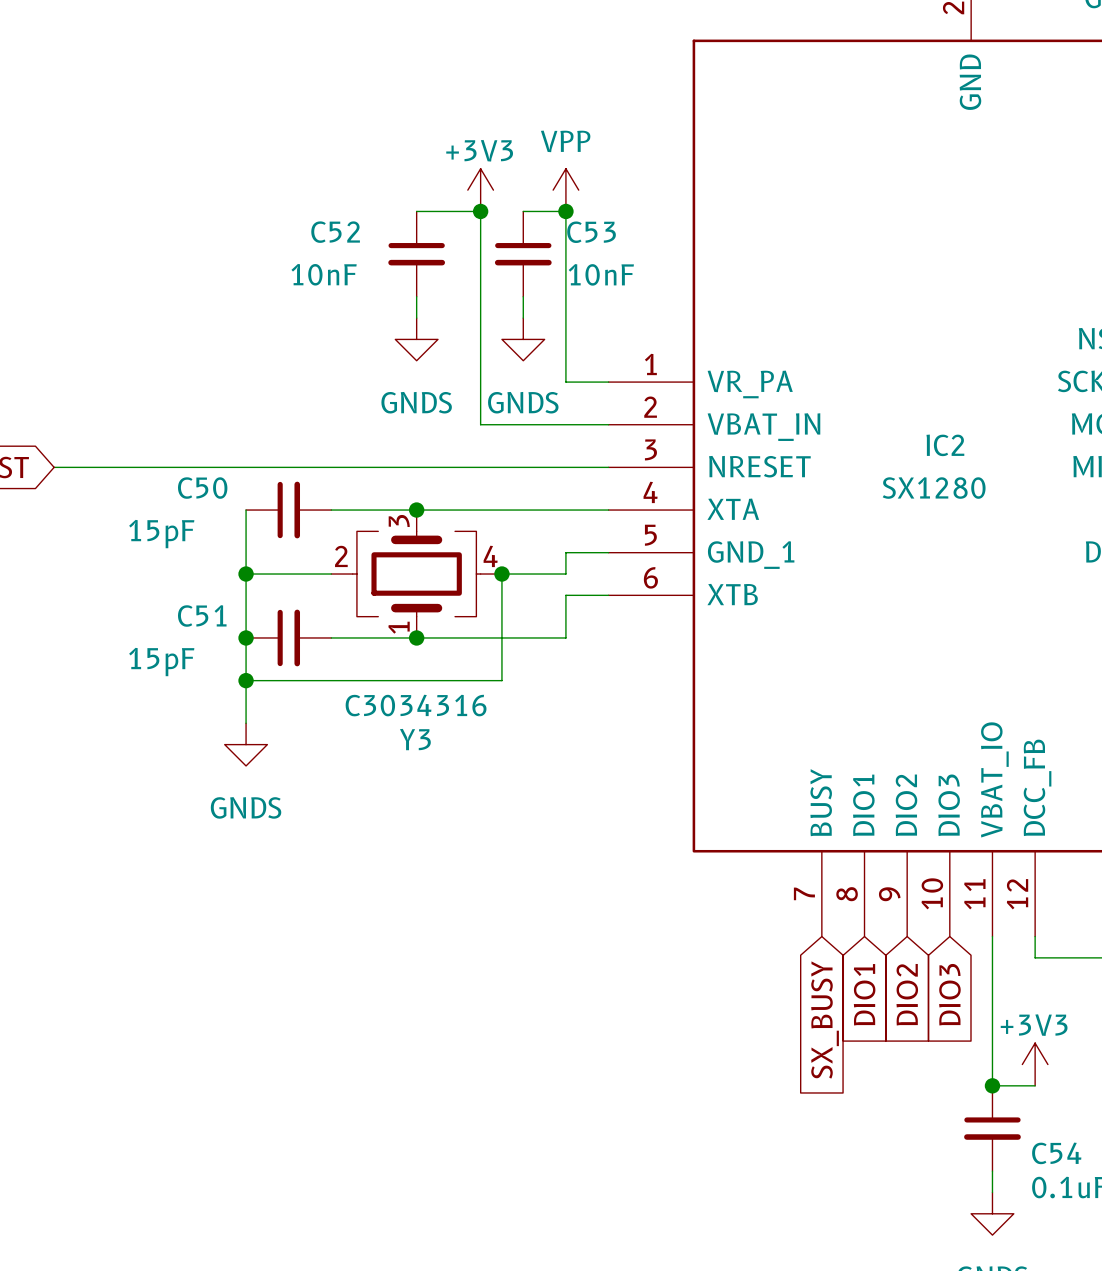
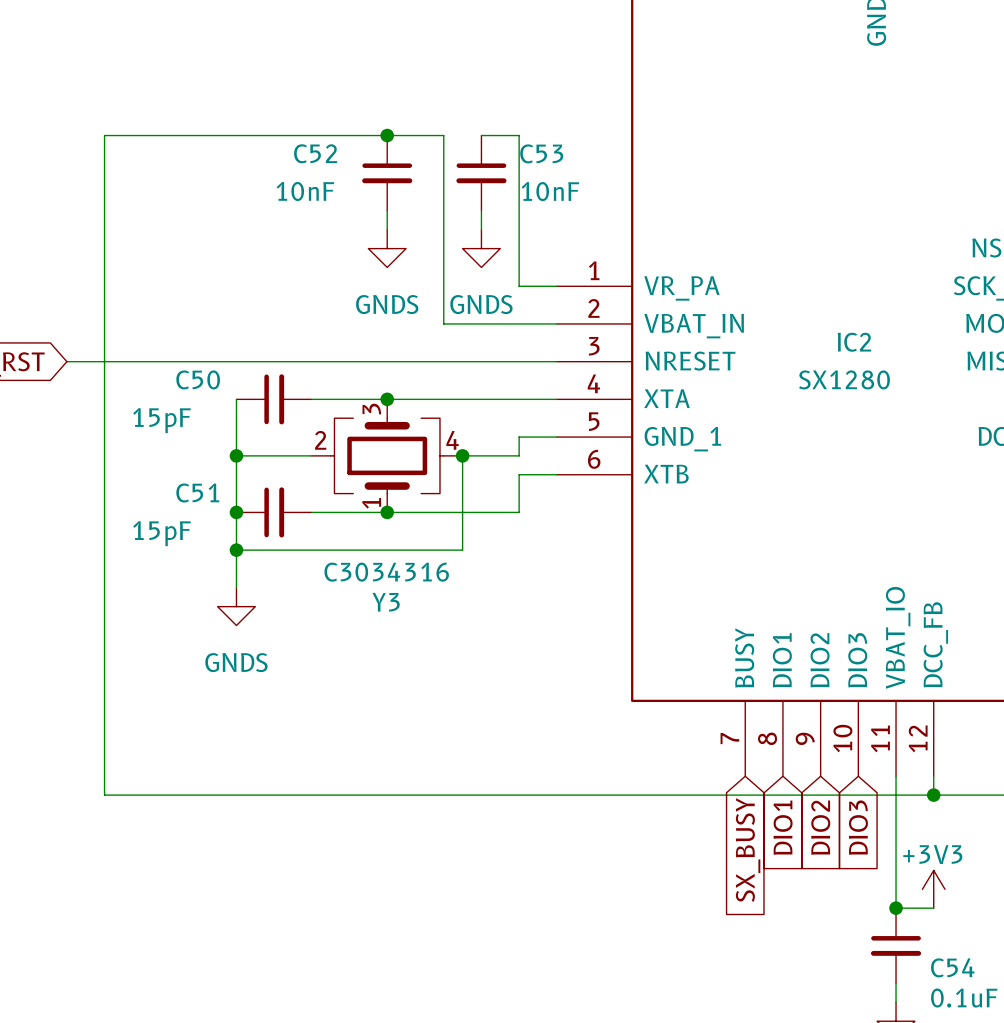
power symbol: +3V3 (480, 190) -> none
power symbol: VPP (565, 190) -> none
wire: none -> (387, 135) (104, 135) (104, 795) (933, 795)
junction position: (480, 211) -> (387, 135)
junction: (565, 211) -> none
junction: none -> (933, 795)

